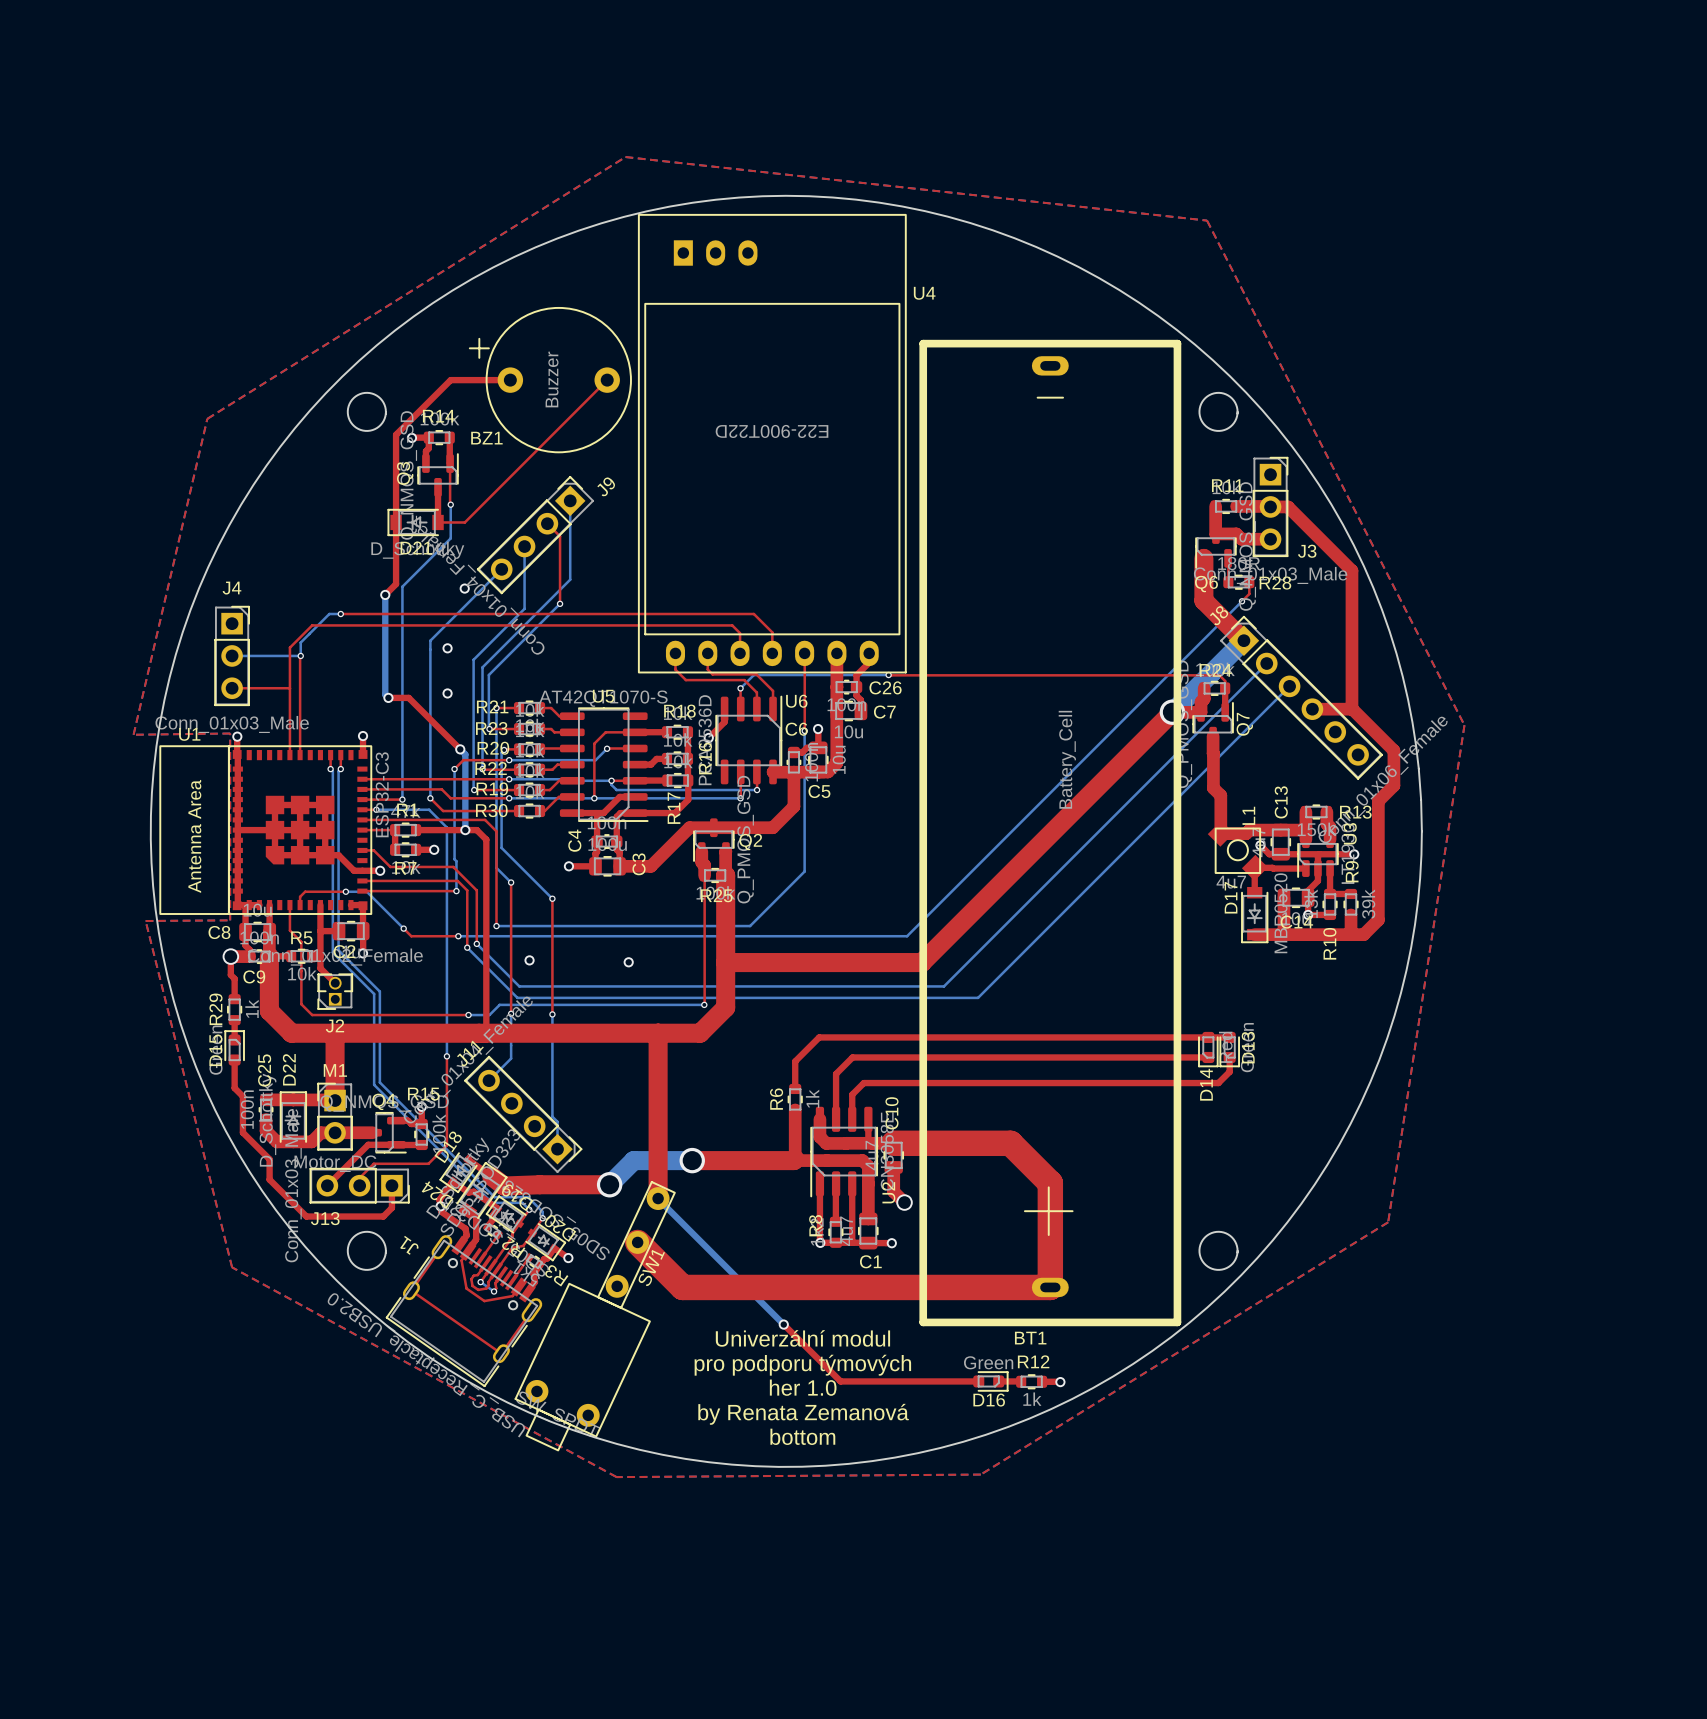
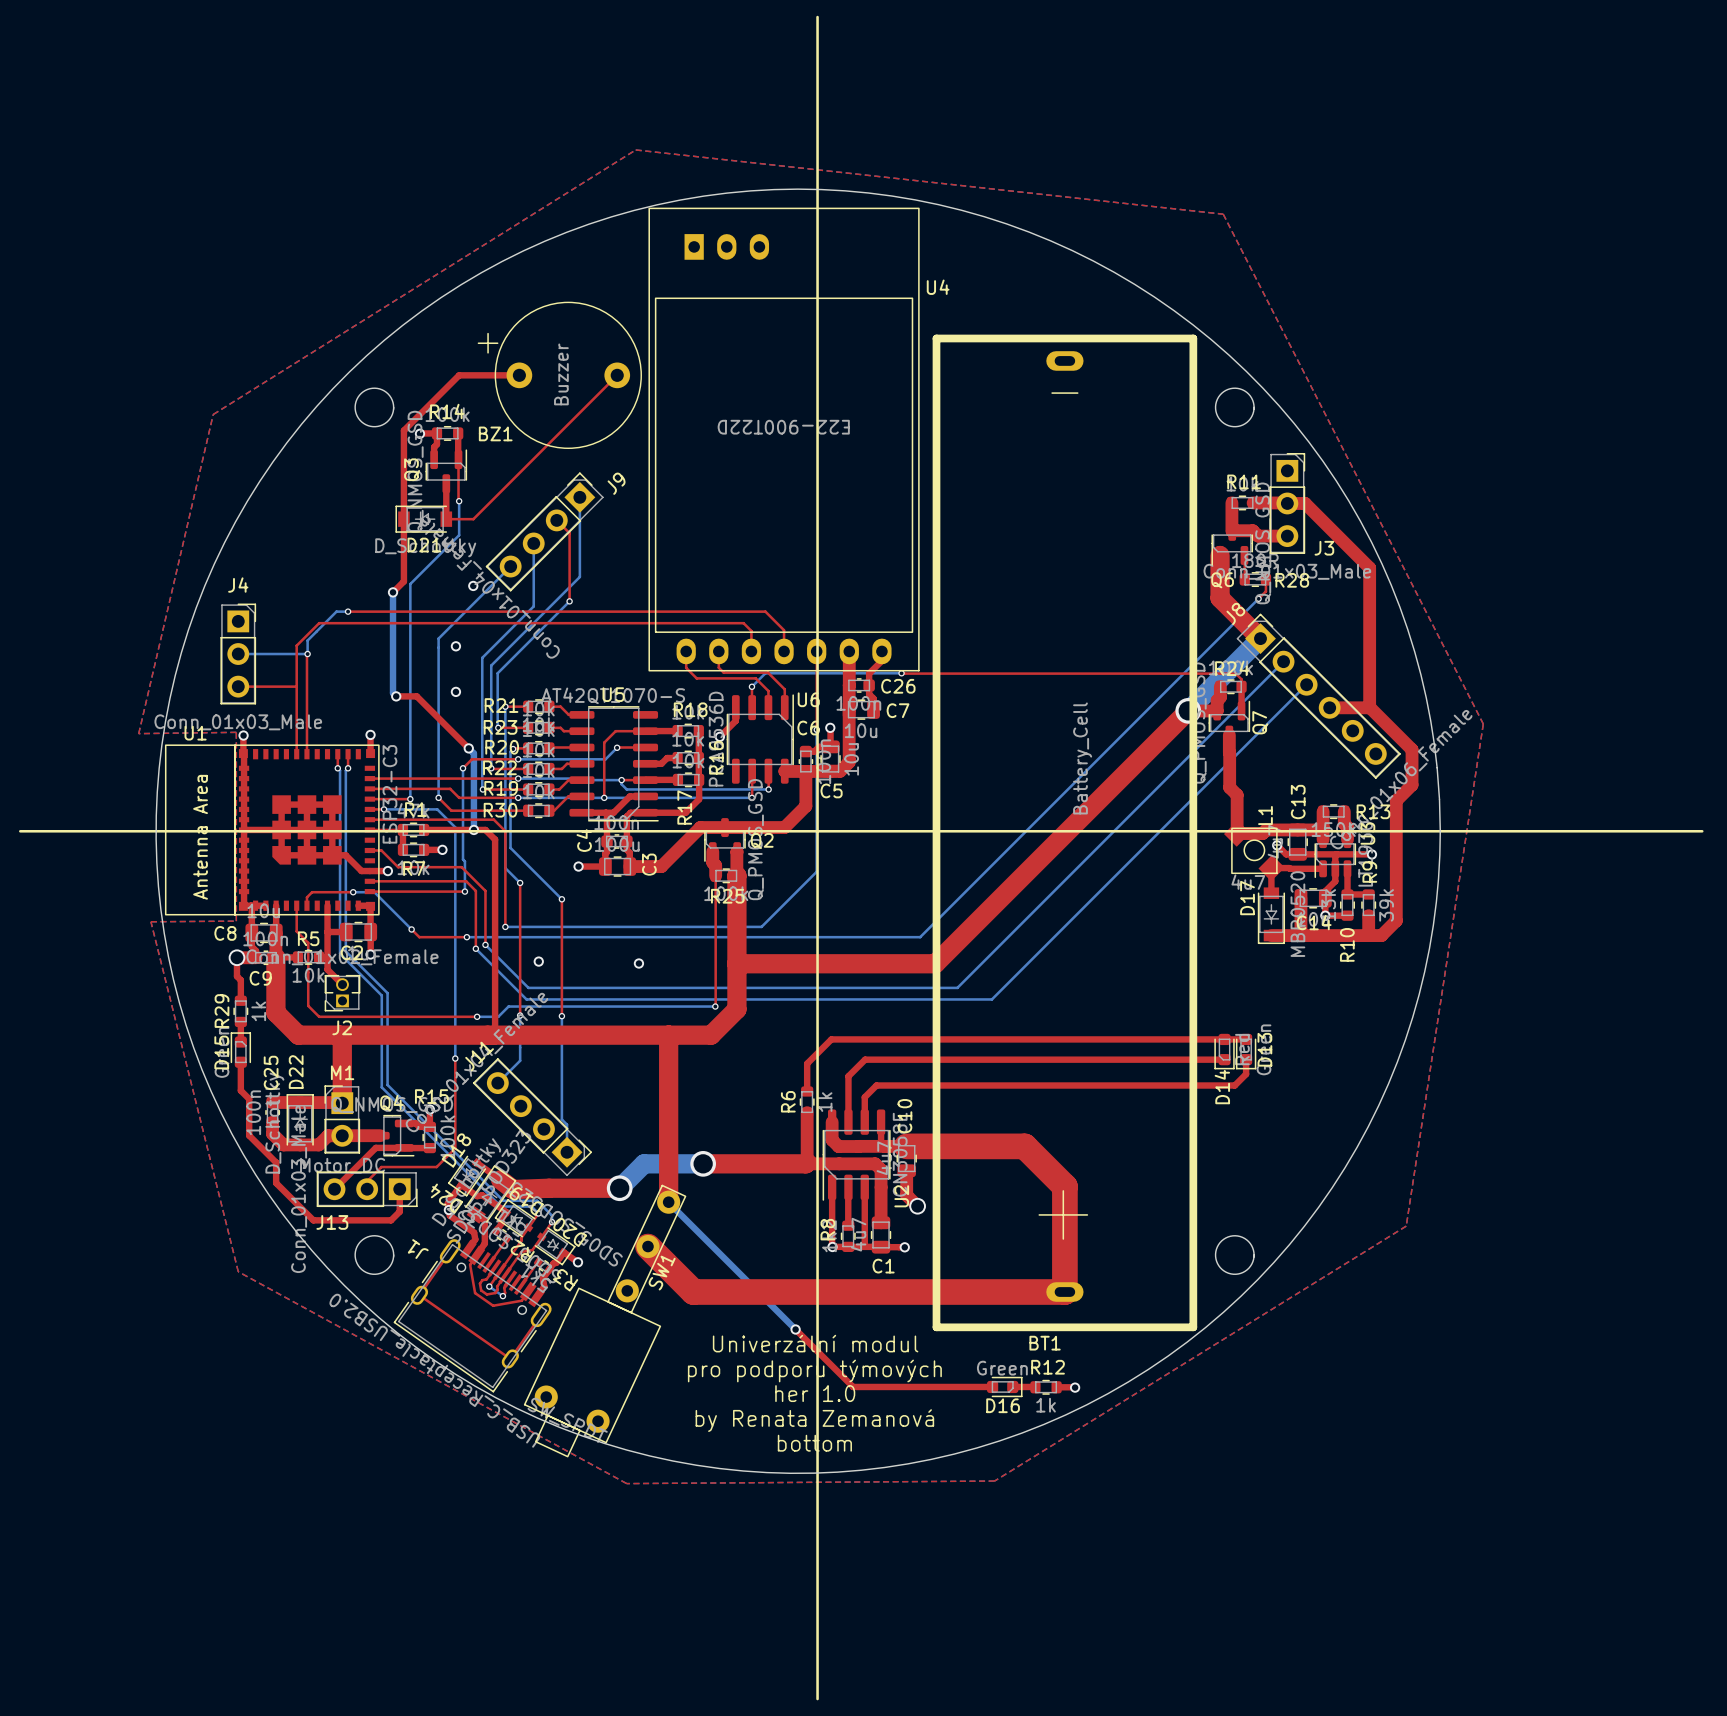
line: none -> (817, 17) (817, 1699)
line: none -> (20, 831) (1702, 831)

